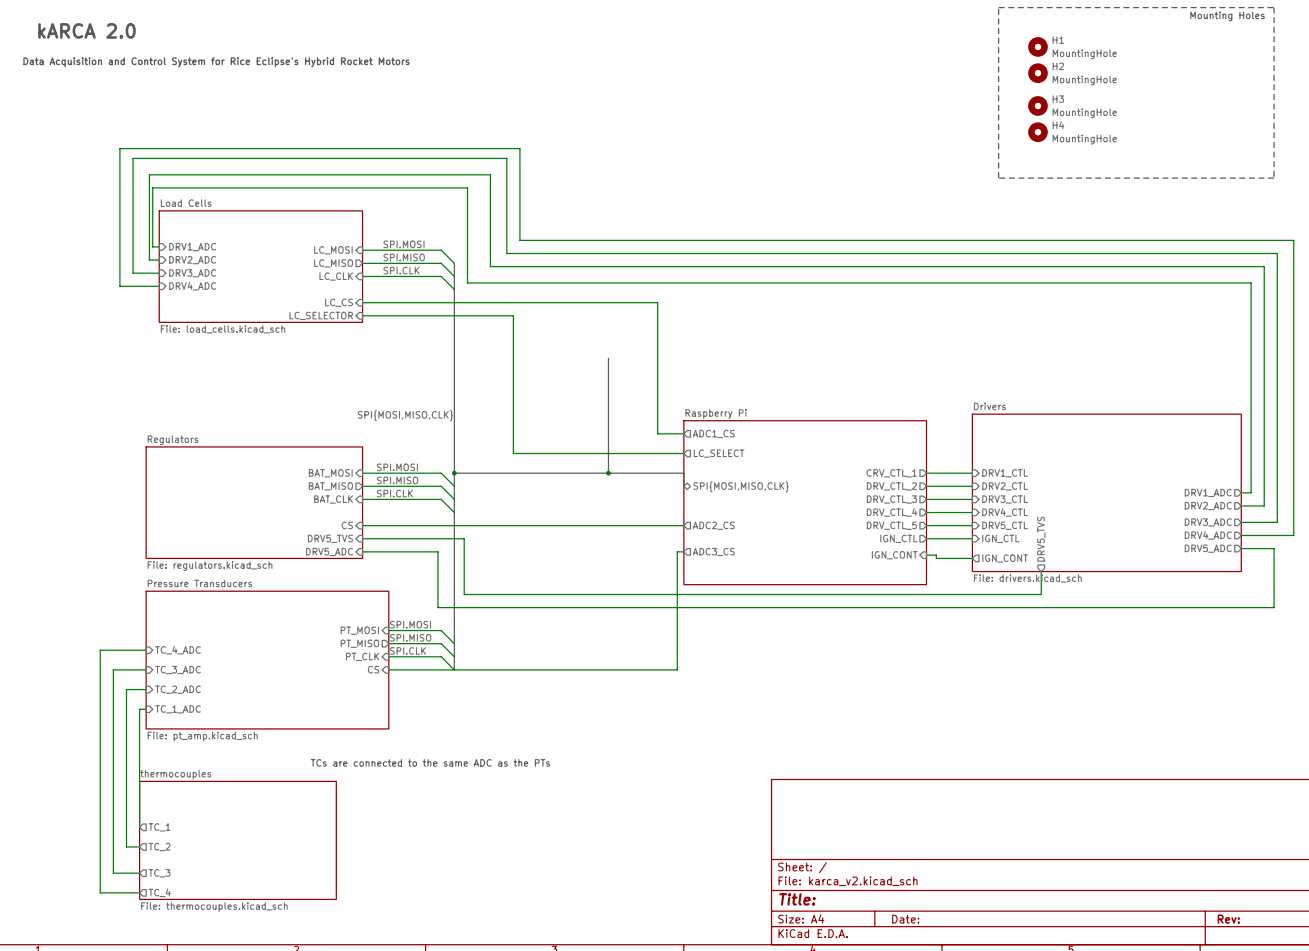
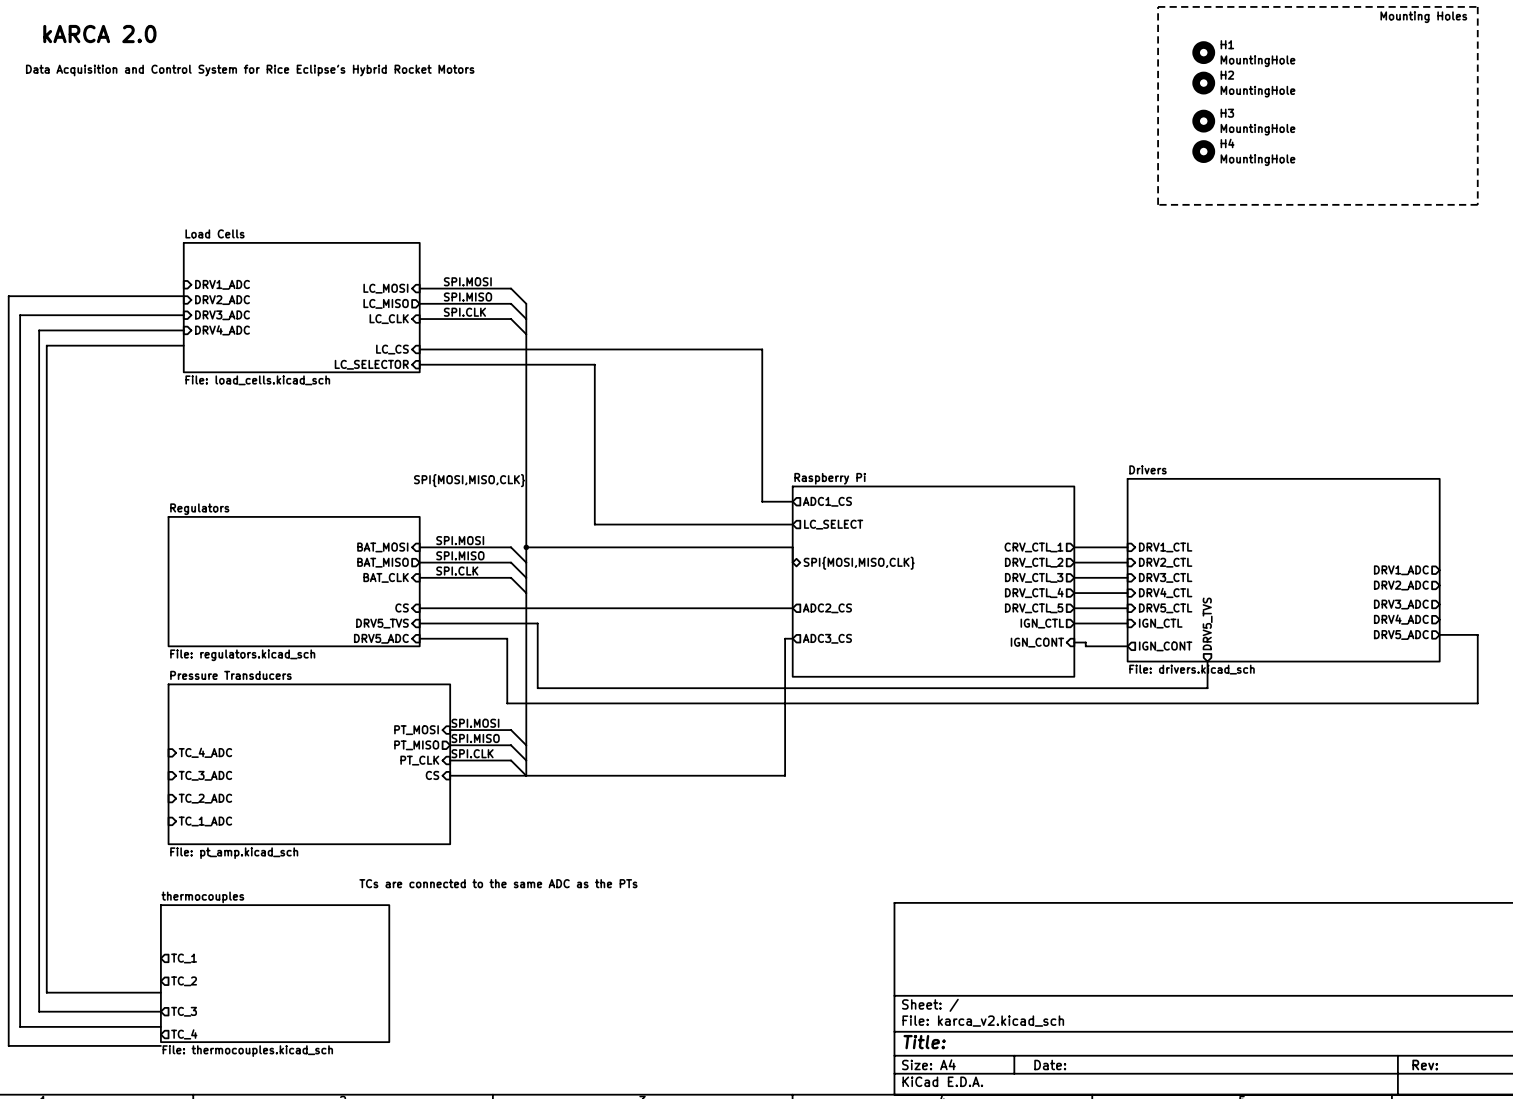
wire: (159, 246) (152, 246) (152, 187) (467, 187) (467, 283) (1251, 283) (1251, 492) (1241, 492) -> none
wire: none -> (183, 296) (8, 296) (8, 1045) (160, 1045)
wire: (159, 260) (149, 260) (149, 174) (490, 174) (490, 266) (1264, 266) (1264, 505) (1241, 505) -> none
wire: (133, 273) (133, 158) (506, 158) (506, 253) (1277, 253) (1277, 522) (1241, 522) -> (153, 315) (20, 315) (20, 1026) (160, 1026)
wire: (119, 286) (119, 148) (519, 148) (519, 240) (1293, 240) (1293, 535) (1241, 535) -> none
wire: none -> (183, 345) (46, 345) (46, 992) (160, 992)
bus: (608, 358) (608, 473) -> none
junction: (608, 473) -> none
wire: (146, 650) (100, 650) (100, 892) (139, 892) -> none
wire: (146, 669) (113, 669) (113, 873) -> (138, 330) (39, 330) (39, 1011) (130, 1011)
wire: (146, 689) (126, 689) (126, 846) (139, 846) -> none
wire: (146, 709) (139, 709) (139, 827) -> none

